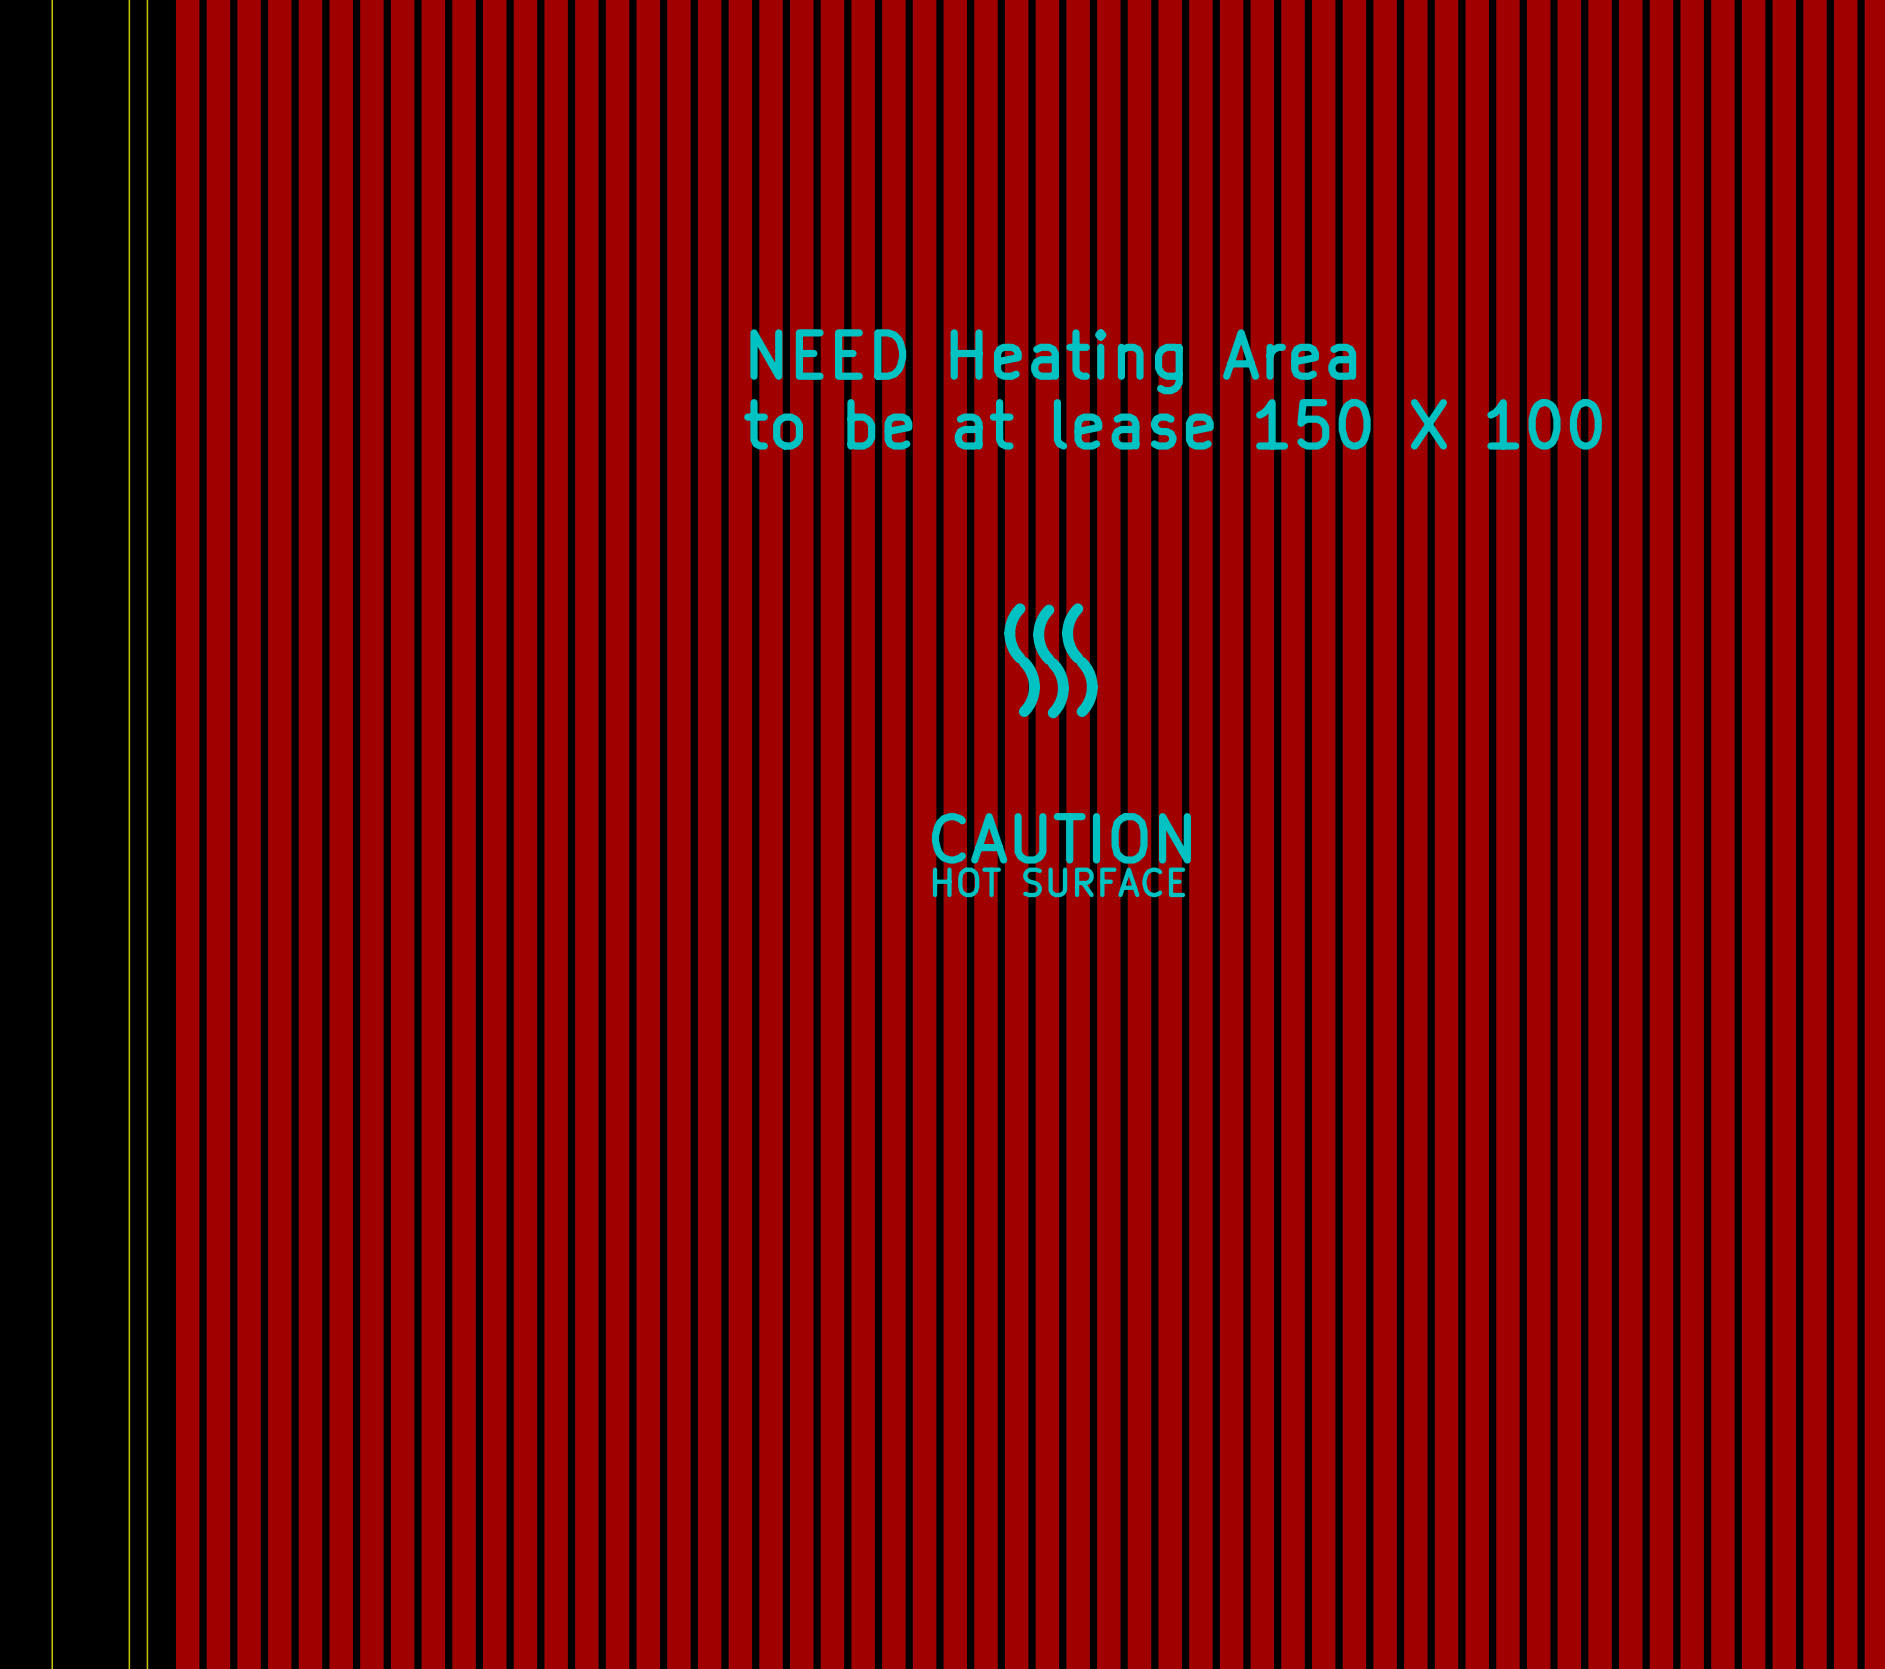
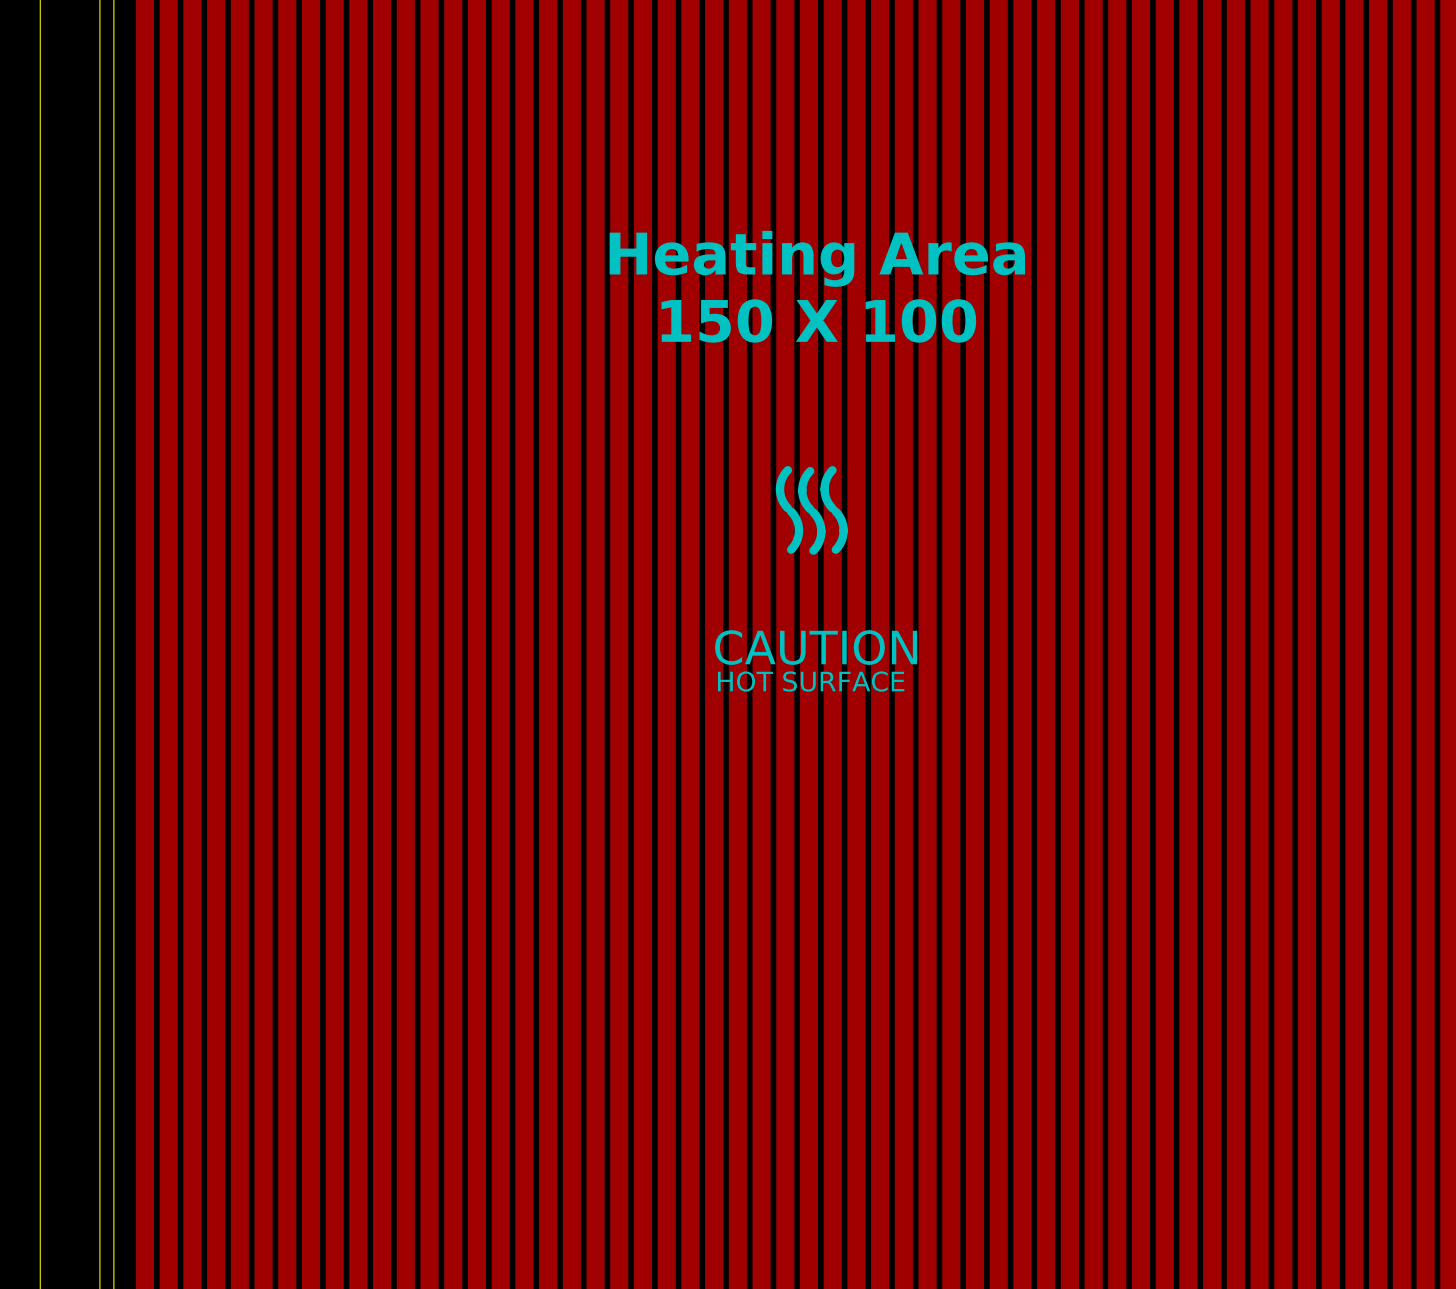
text: NEED Heating Area (1053, 361) -> Heating Area (817, 258)
text: none -> 150 X 100 (818, 320)
text: to be at lease 150 X 100 (1173, 424) -> none

